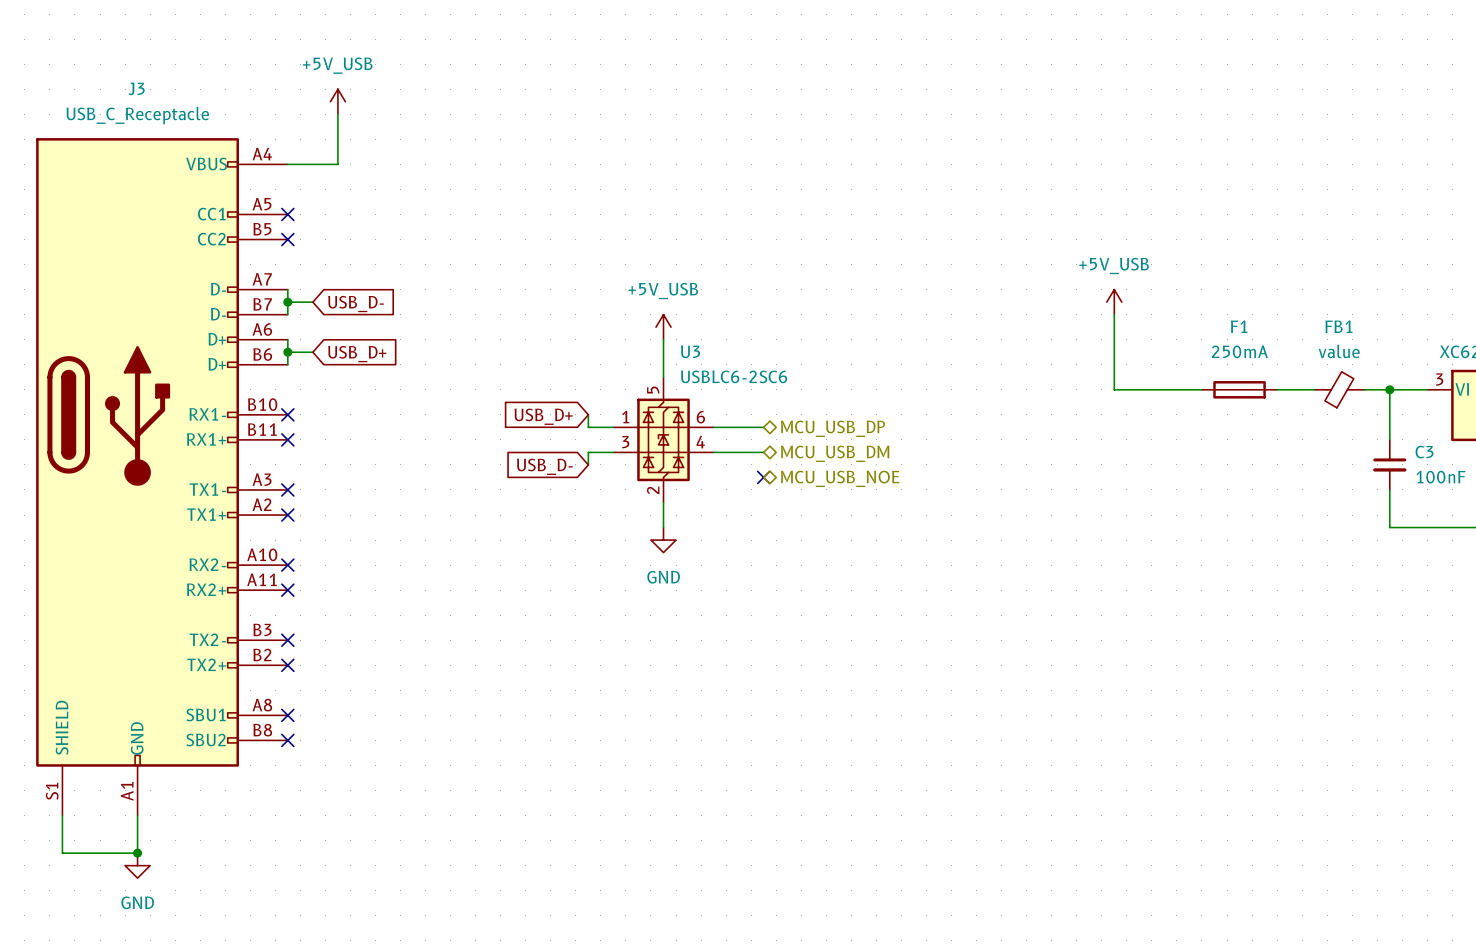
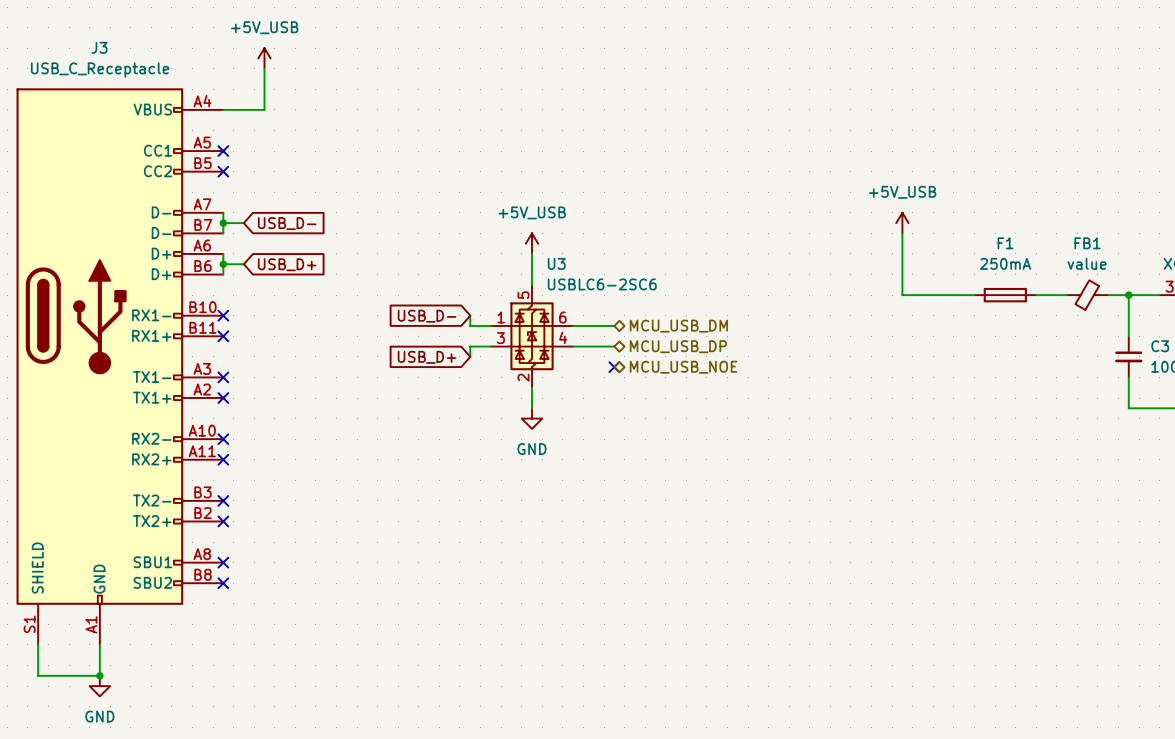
global label: USB_D+ (543, 416) -> USB_D- (427, 316)
hierarchical label: MCU_USB_DP (832, 428) -> MCU_USB_DM (678, 326)
hierarchical label: MCU_USB_DM (835, 453) -> MCU_USB_DP (678, 346)
global label: USB_D- (544, 466) -> USB_D+ (427, 357)

